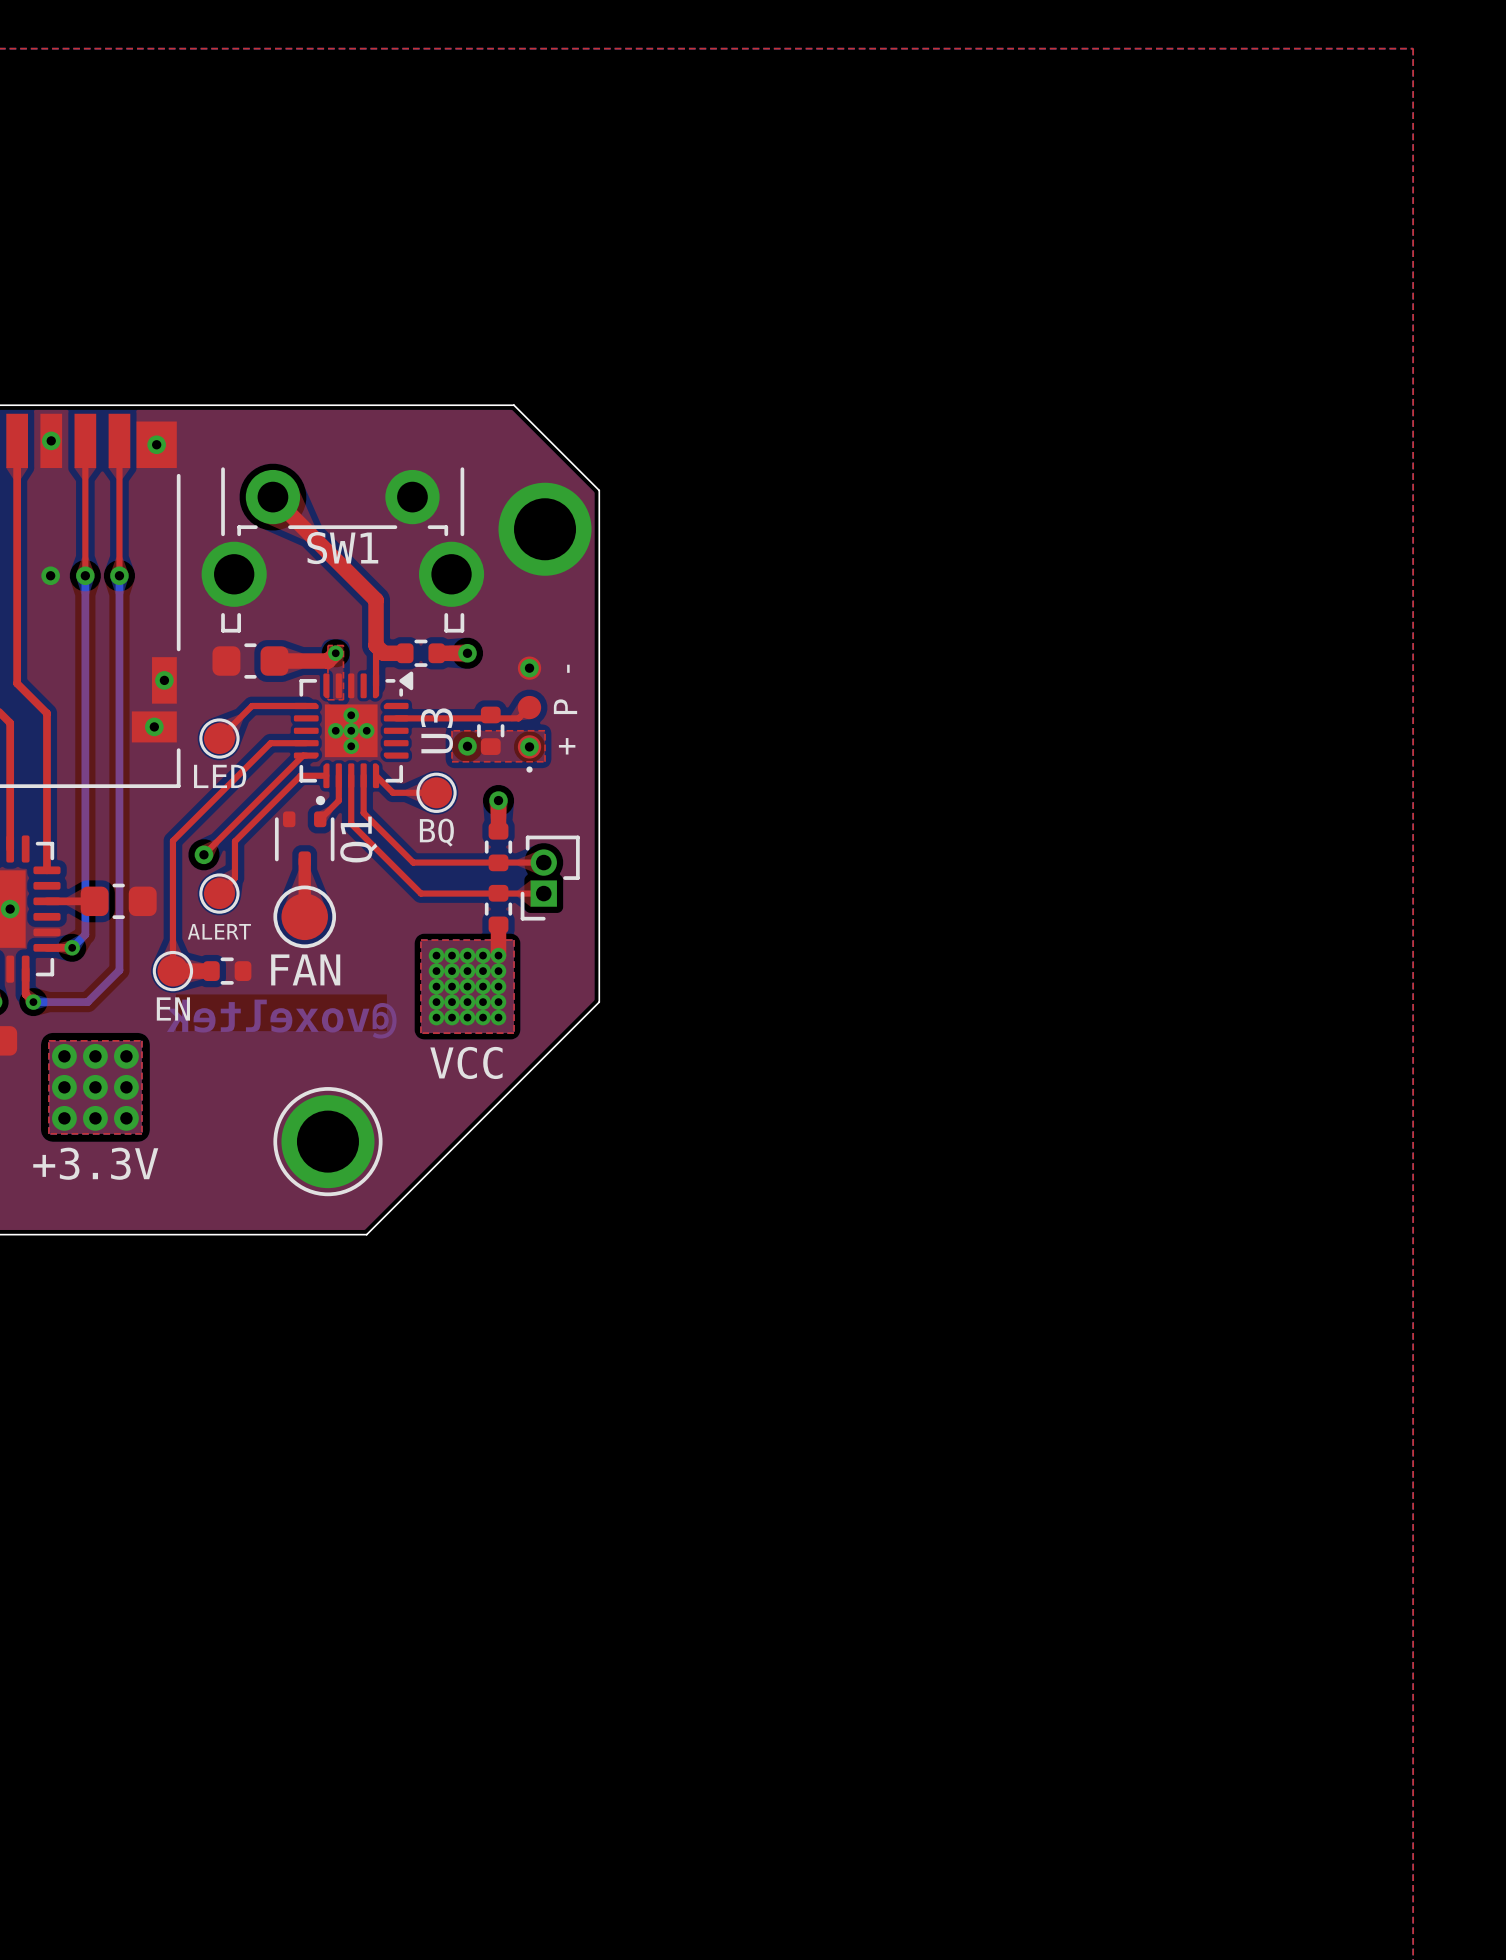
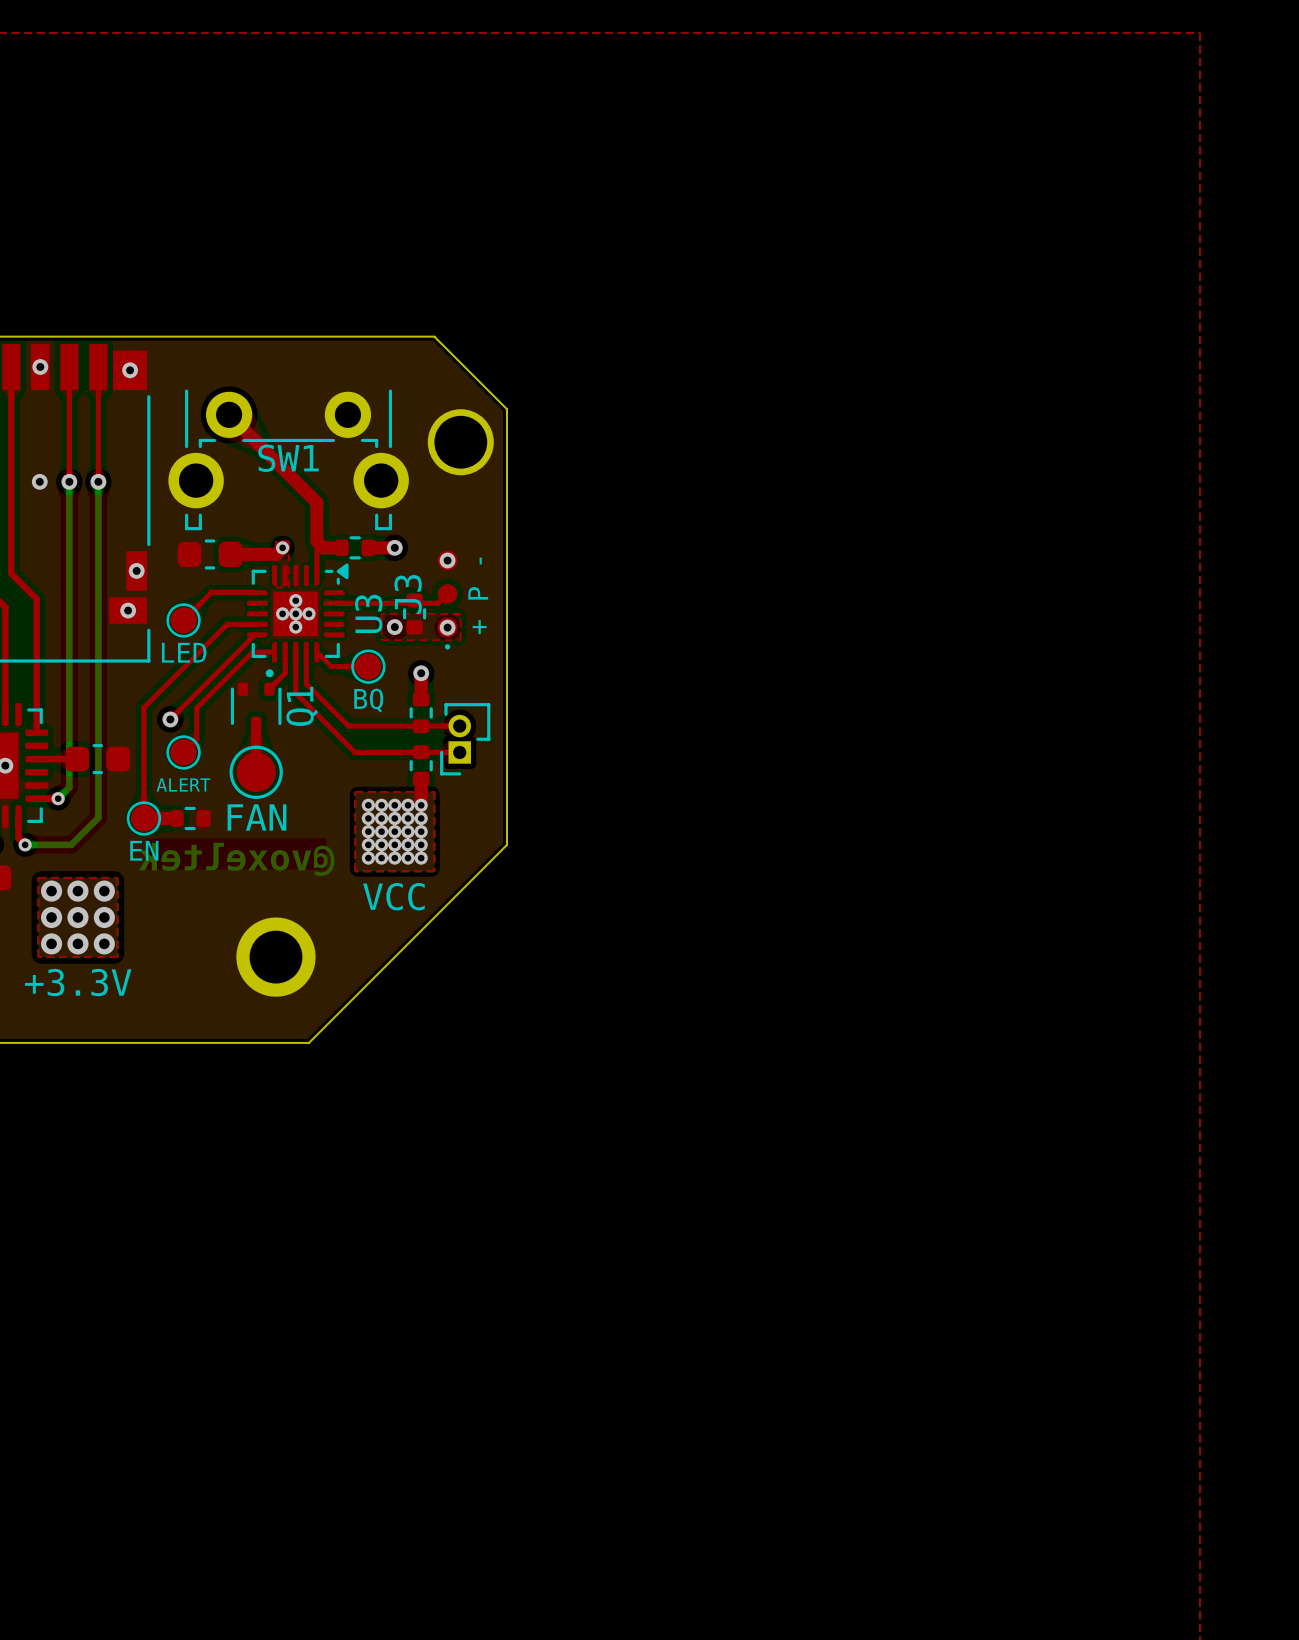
part footprint: [498, 482, 592, 576] -> [427, 409, 494, 476]
J3 name: none -> J3 (408, 594)
part footprint: [273, 1087, 383, 1197] -> [236, 917, 316, 997]

